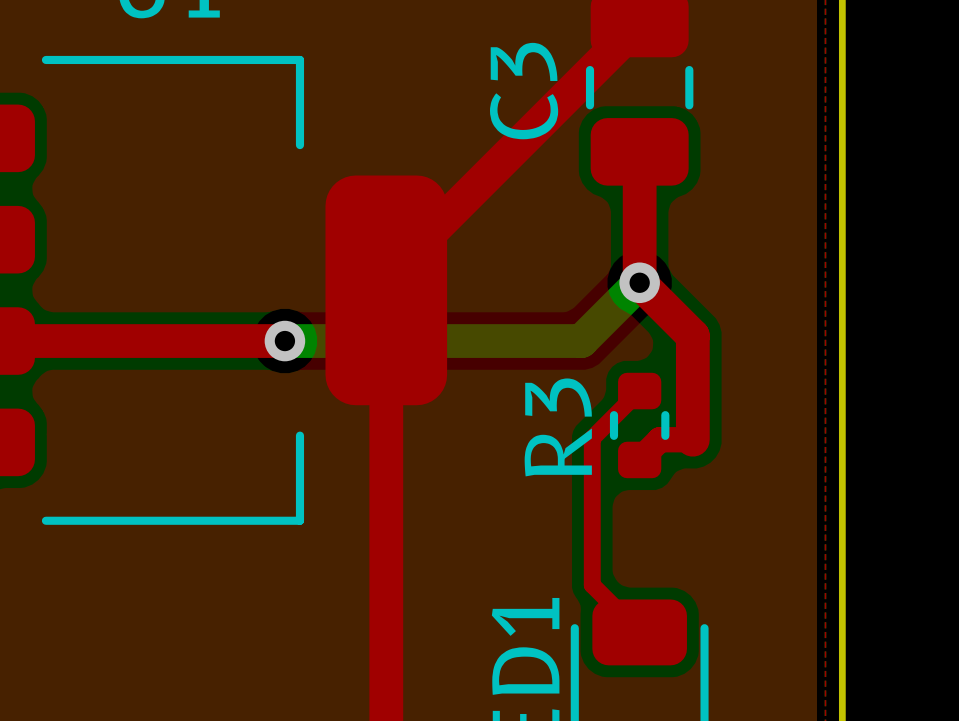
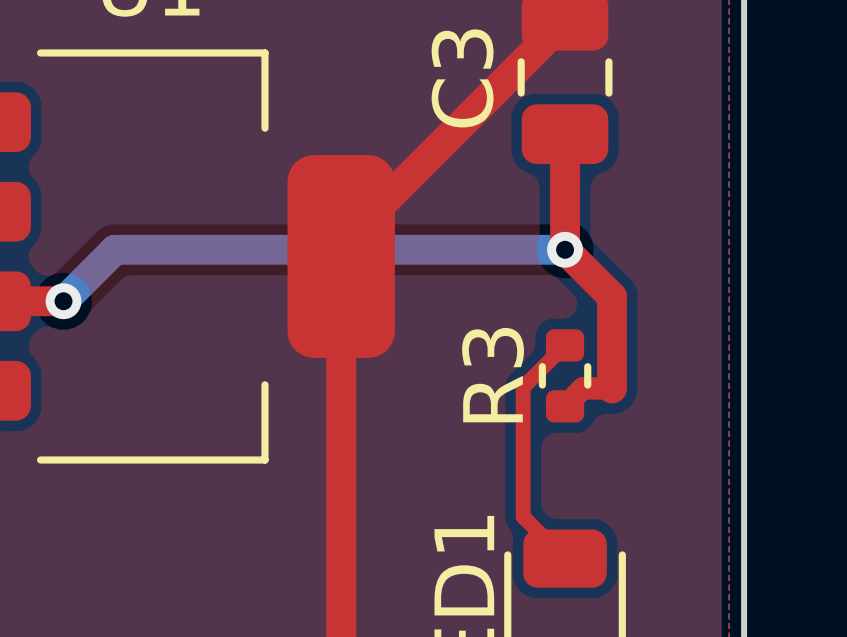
bottom track: (639, 282) (581, 341) (284, 341) -> (565, 249) (114, 249) (63, 301)
top track: (71, 341) (284, 341) -> none
via position: (284, 341) -> (63, 301)

